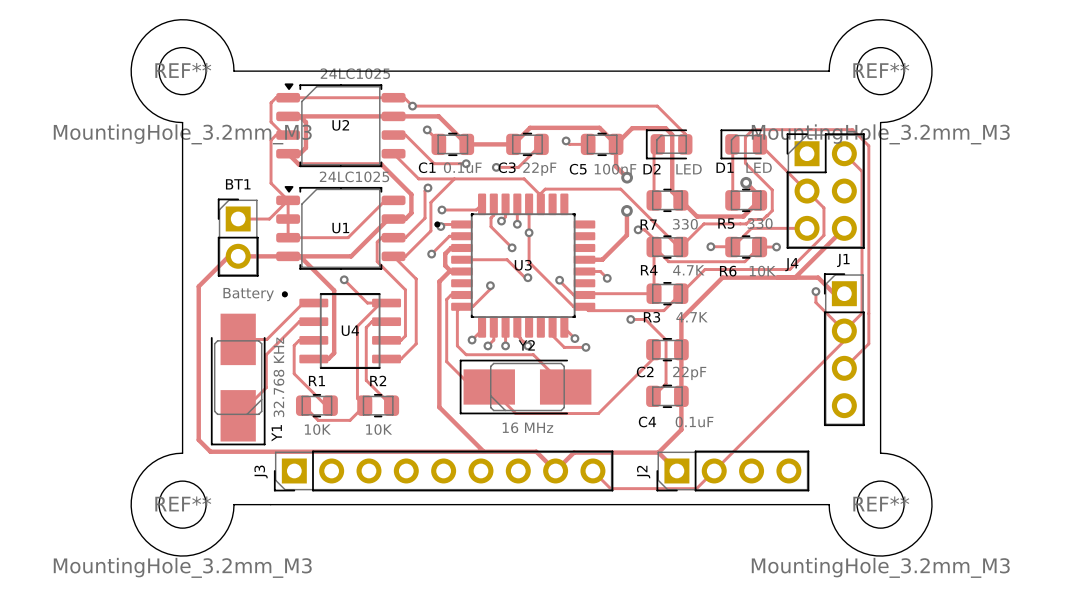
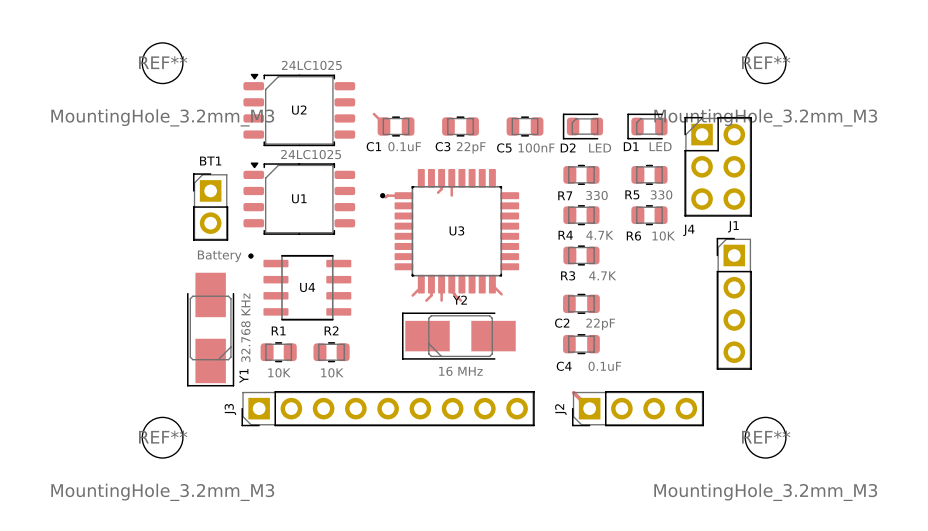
board edge: (234, 71) (829, 71) (830, 58) (838, 41) (847, 31) (858, 24) (870, 20) (882, 19) (895, 21) (906, 26) (916, 34) (924, 44) (929, 56) (931, 75) (926, 93) (915, 108) (899, 119) (880, 122) (880, 453) (893, 454) (905, 459) (915, 466) (923, 476) (929, 487) (931, 506) (929, 519) (924, 530) (916, 541) (901, 551) (889, 555) (876, 555) (858, 550) (842, 539) (832, 523) (829, 504) (234, 504) (232, 517) (227, 529) (215, 543) (205, 550) (193, 554) (180, 556) (167, 553) (156, 548) (146, 541) (138, 530) (131, 513) (131, 500) (136, 482) (147, 466) (163, 456) (182, 453) (182, 122) (163, 119) (152, 112) (143, 104) (136, 93) (132, 81) (131, 62) (138, 44) (150, 30) (167, 21) (186, 19) (205, 24) (220, 36) (230, 52) (234, 71) -> none
via: (412, 106) -> none
track: (288, 116) (438, 116) (466, 144) (513, 144) (530, 127) (599, 127) (616, 144) -> none
track: (300, 116) (305, 122) (305, 147) (300, 153) (288, 153) (298, 164) (381, 164) (411, 194) (411, 213) (405, 219) (388, 219) (351, 256) (228, 256) (198, 286) (198, 439) (210, 451) (536, 451) (555, 470) (573, 452) (658, 452) (681, 429) (681, 318) (722, 277) (818, 277) (834, 293) (844, 293) -> none
via: (427, 129) -> none
track: (284, 135) (271, 121) (271, 102) (276, 97) (404, 97) (412, 106) (657, 106) (685, 134) (685, 144) -> none
track: (288, 135) (276, 135) (271, 140) (271, 183) (288, 200) -> none
track: (393, 135) (405, 135) (434, 163) (466, 163) -> none
track: (566, 140) (569, 144) (588, 144) -> none
via: (566, 140) -> none
track: (541, 144) (518, 167) (496, 167) -> none
track: (616, 144) (632, 128) (665, 128) (672, 134) (672, 191) (697, 216) (743, 216) (759, 200) (759, 196) (746, 182) -> none
track: (616, 144) (616, 166) (627, 177) -> none
track: (657, 144) (654, 148) (654, 200) -> none
track: (732, 144) (732, 200) -> none
track: (759, 144) (823, 207) (823, 235) (789, 269) (705, 269) (663, 310) (588, 310) (584, 306) (573, 306) (529, 262) (529, 204) -> none
track: (393, 153) (418, 178) (524, 178) (540, 195) -> none
track: (844, 153) (862, 171) (862, 313) (844, 331) -> none
via: (466, 163) -> none
via: (496, 167) -> none
via: (627, 177) -> none
track: (454, 178) (430, 202) (430, 230) (405, 256) (393, 256) (416, 279) (416, 343) (401, 359) (386, 359) -> none
via: (746, 182) -> none
track: (427, 187) (425, 190) (425, 218) (405, 237) (381, 237) (377, 242) (377, 261) (405, 289) (405, 335) (401, 340) (386, 340) -> none
via: (427, 187) -> none
track: (288, 200) (269, 219) (228, 219) -> none
track: (288, 200) (288, 237) (348, 237) (385, 200) (393, 200) -> none
track: (482, 204) (476, 210) (441, 210) -> none
track: (493, 204) (491, 226) (512, 247) -> none
track: (540, 204) (540, 193) (545, 189) (620, 189) (678, 247) (680, 247) (703, 223) (746, 223) (750, 219) (763, 219) (772, 210) (772, 190) (745, 163) (745, 137) (752, 129) (852, 129) (868, 145) (868, 343) (844, 368) -> none
via: (441, 210) -> none
track: (626, 210) (626, 235) (602, 259) (584, 259) -> none
via: (626, 210) -> none
via: (501, 221) -> none
via: (517, 224) -> none
via: (440, 226) -> none
track: (807, 228) (751, 228) (732, 247) (710, 246) -> none
track: (638, 229) (644, 229) (654, 239) (654, 293) (573, 295) (559, 280) -> none
via: (638, 229) -> none
track: (844, 229) (795, 277) -> none
via: (529, 232) -> none
track: (461, 236) (449, 236) (431, 254) -> none
via: (710, 246) -> none
track: (461, 247) (451, 247) (445, 253) (445, 265) (451, 271) -> none
via: (512, 247) -> none
track: (654, 247) (668, 261) (744, 261) (759, 247) (776, 247) -> none
via: (776, 247) -> none
via: (431, 254) -> none
track: (300, 256) (334, 290) (334, 353) (328, 359) (313, 359) -> none
track: (461, 259) (507, 259) (525, 277) (527, 277) -> none
track: (461, 271) (449, 271) (439, 281) (439, 407) (483, 451) -> none
track: (584, 271) (600, 271) (607, 278) -> none
via: (527, 277) -> none
via: (607, 278) -> none
track: (344, 279) (367, 303) (386, 303) -> none
via: (344, 279) -> none
via: (559, 280) -> none
track: (490, 285) (490, 289) (472, 306) (461, 306) (457, 310) (457, 345) (466, 354) (533, 354) (565, 387) -> none
via: (490, 285) -> none
track: (815, 291) (815, 302) (844, 331) -> none
via: (815, 291) -> none
track: (461, 295) (451, 295) (446, 299) (446, 361) (471, 387) (489, 387) (515, 413) (598, 413) (653, 358) (653, 349) -> none
track: (313, 303) (303, 303) (266, 339) (238, 339) -> none
track: (380, 303) (357, 326) (357, 398) (364, 405) (350, 420) (318, 420) (303, 405) -> none
track: (630, 319) (645, 319) (666, 340) (666, 383) (653, 396) -> none
via: (630, 319) -> none
track: (313, 321) (299, 321) (266, 354) (266, 387) (238, 415) -> none
track: (386, 321) (372, 321) (366, 327) (366, 380) (391, 405) -> none
track: (552, 326) (552, 335) (564, 347) (585, 347) -> none
track: (844, 331) (844, 340) (696, 488) (610, 488) (592, 470) -> none
via: (574, 338) -> none
track: (313, 340) (299, 340) (294, 345) (294, 373) (326, 405) (330, 405) -> none
via: (472, 340) -> none
via: (487, 345) -> none
via: (505, 345) -> none
via: (527, 345) -> none
via: (585, 347) -> none

